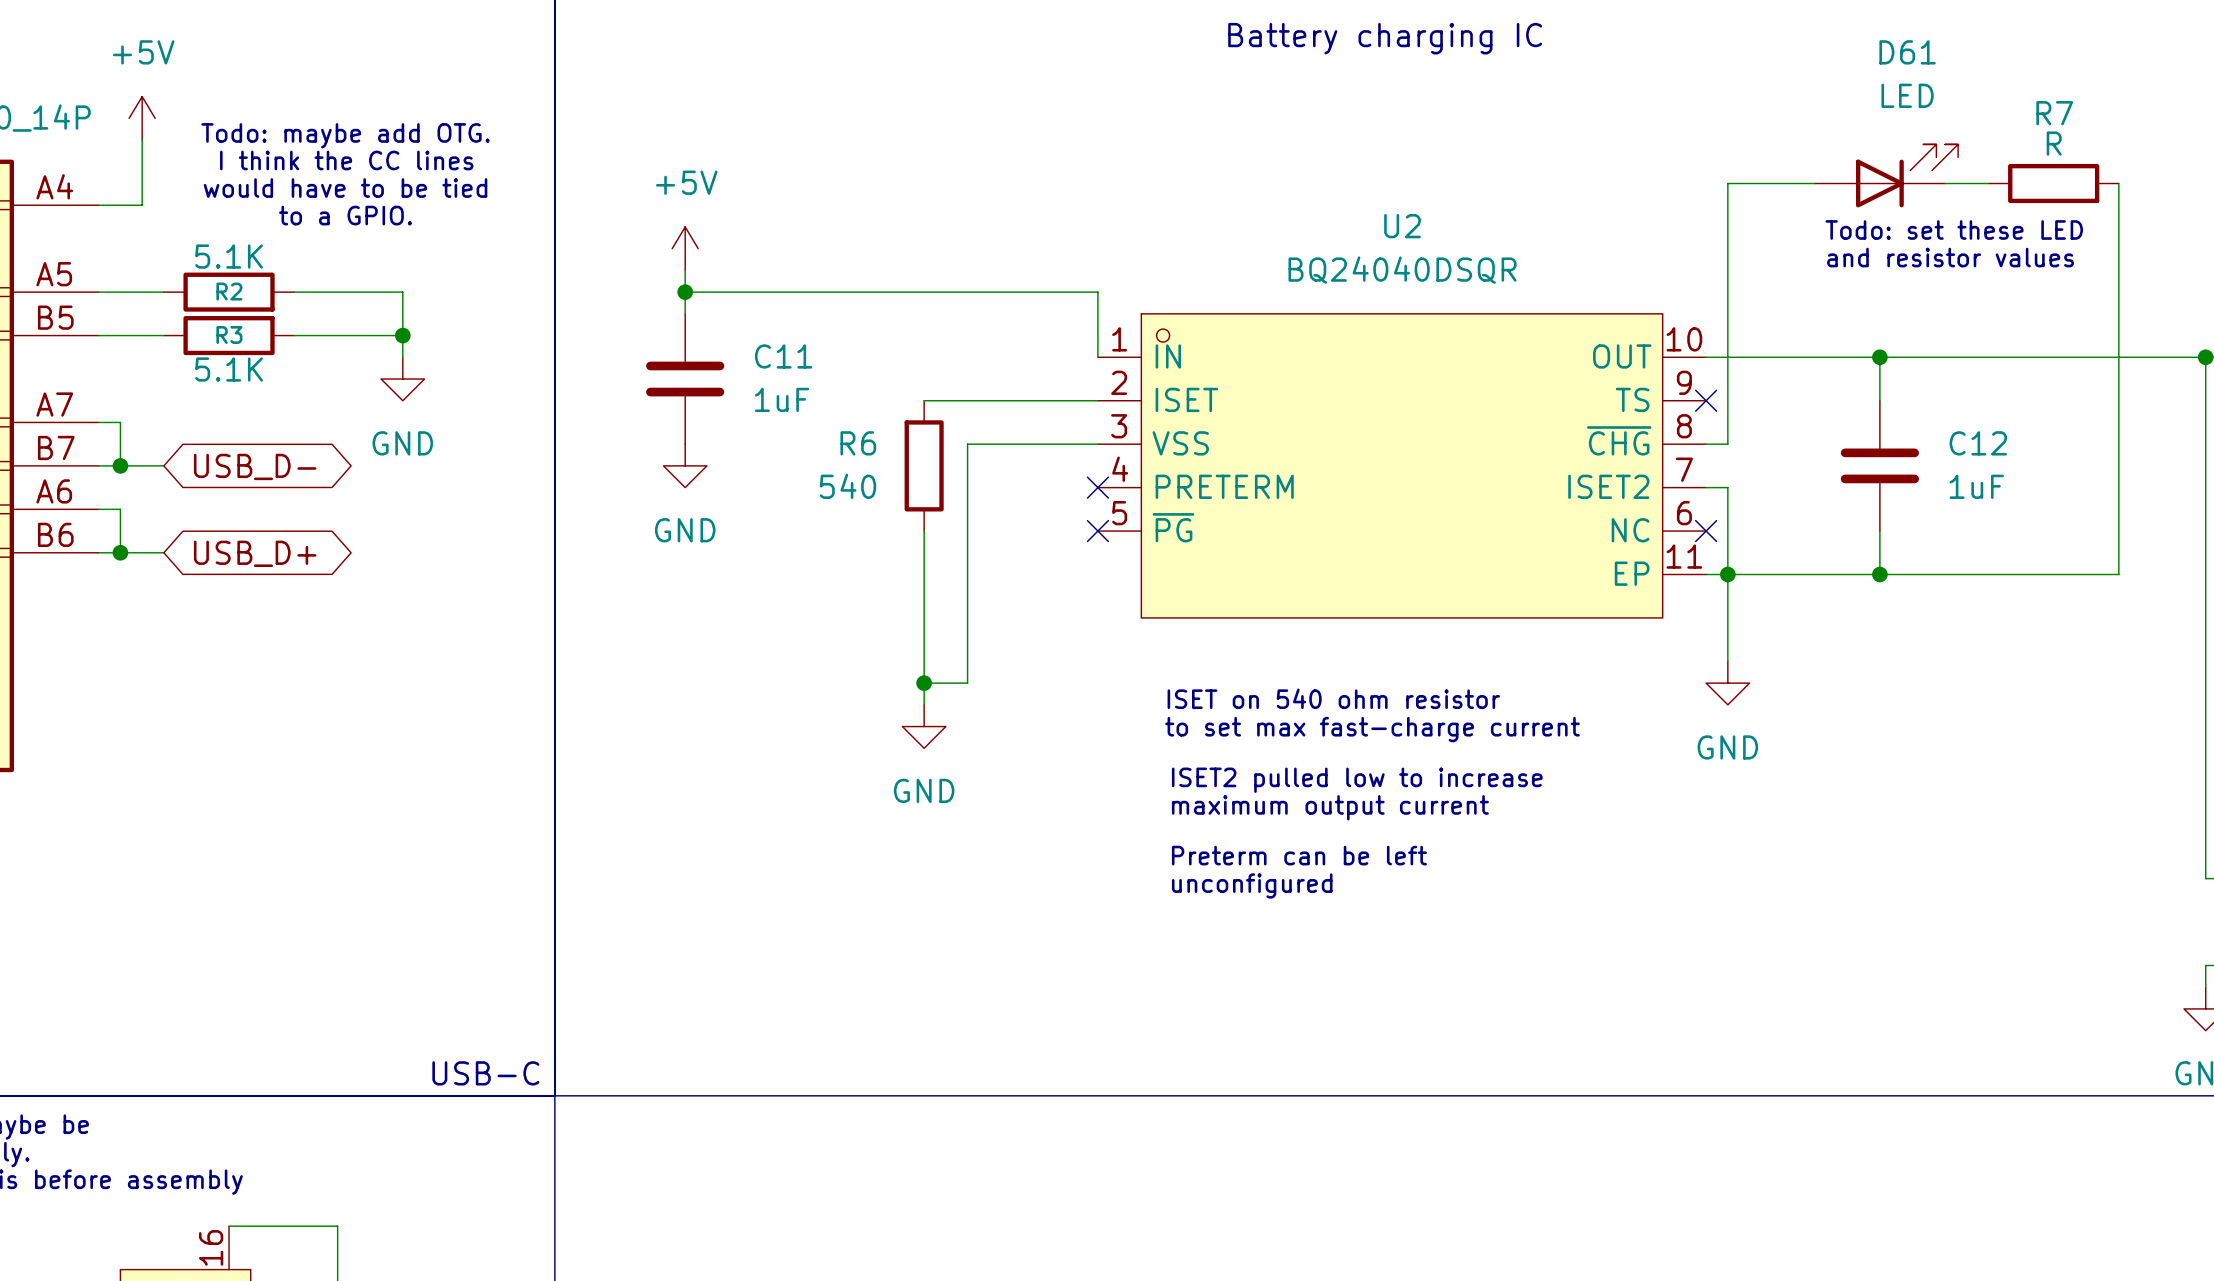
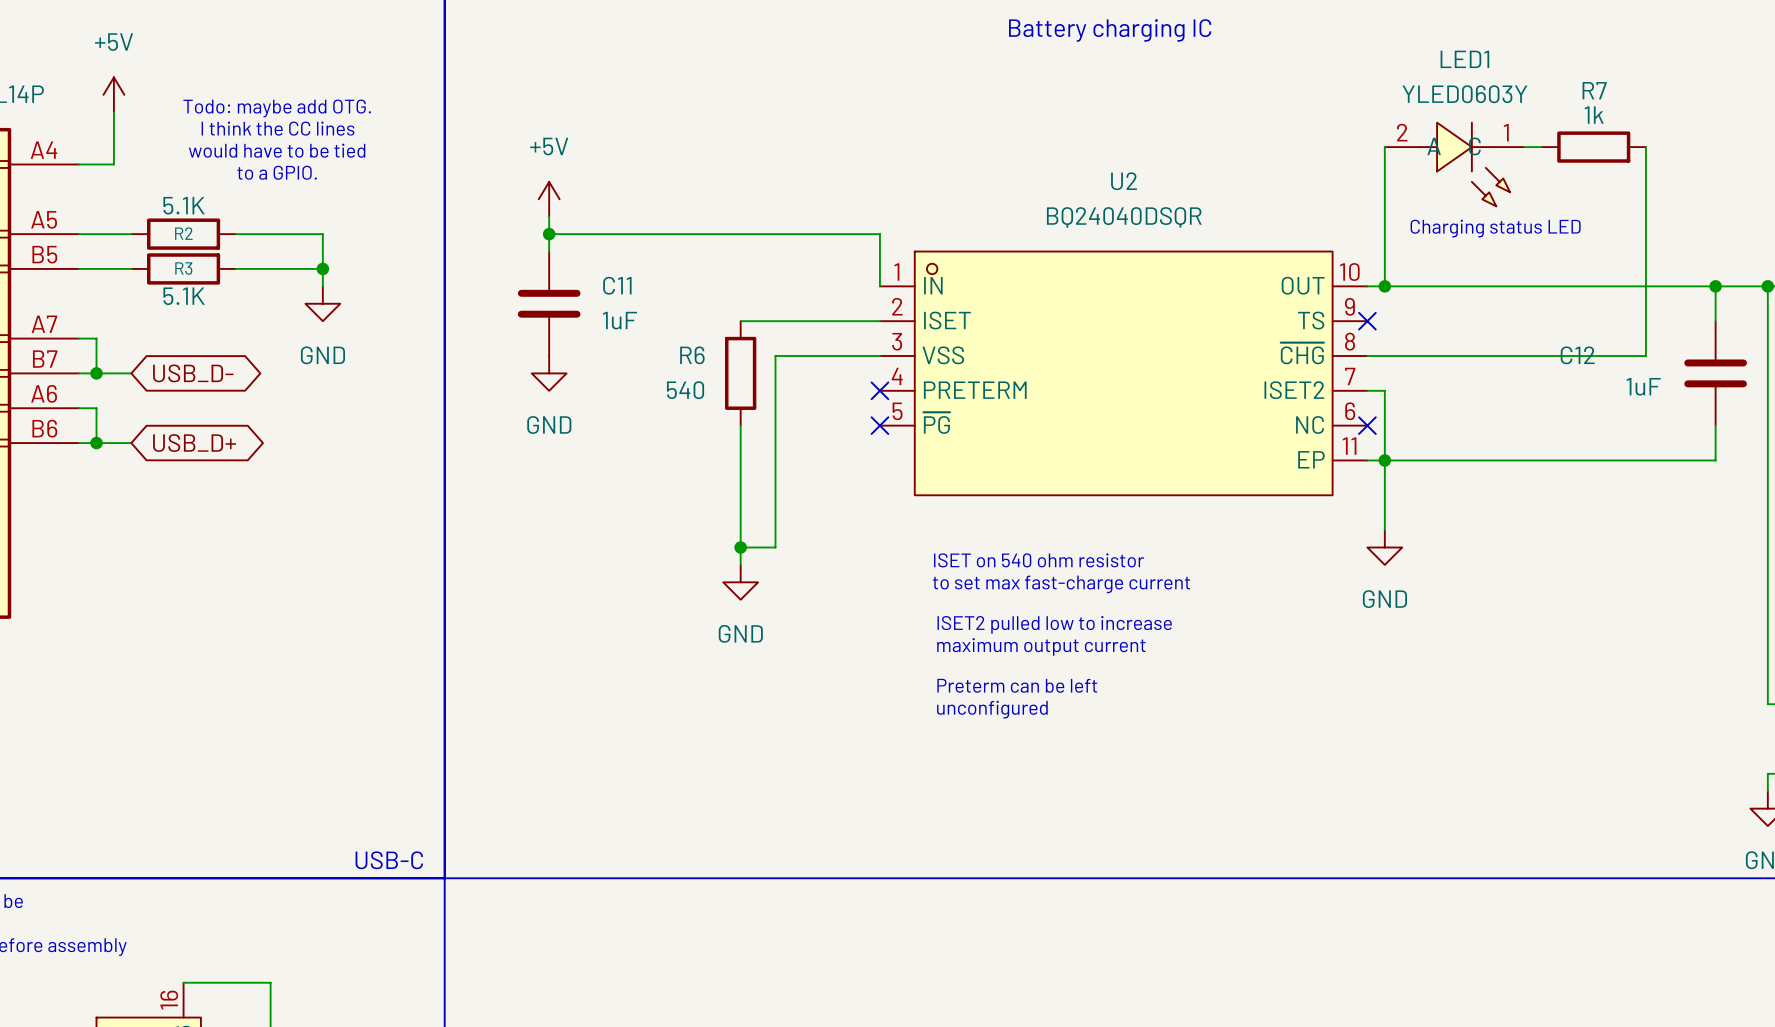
R7 value: R (2054, 143) -> 1k (1594, 115)
D61: LED (1886, 175) -> none
wire: (1945, 183) (1988, 183) -> none
R7 position: (2053, 183) -> (1593, 147)
wire: (2118, 183) (2118, 574) -> (1715, 425) (1715, 460) (1698, 460)
LED1: none -> YLED0603Y (1454, 164)
text: Todo: set these LED (1954, 229) -> none
text: and resistor values (1950, 257) -> none
text: none -> Charging status LED (1495, 228)
wire: (1727, 357) (1727, 444) -> (1645, 147) (1645, 355) (1384, 355)
junction: none -> (1384, 286)
wire: (1879, 357) (1879, 400) -> (1715, 286) (1715, 321)
junction: (1879, 357) -> none
junction: none -> (1715, 286)
C12 position: (1879, 465) -> (1715, 373)
C12 value position: 1uF (1976, 486) -> 1uF (1643, 386)
wire: (1879, 531) (1879, 574) -> none
junction: (1879, 574) -> none

